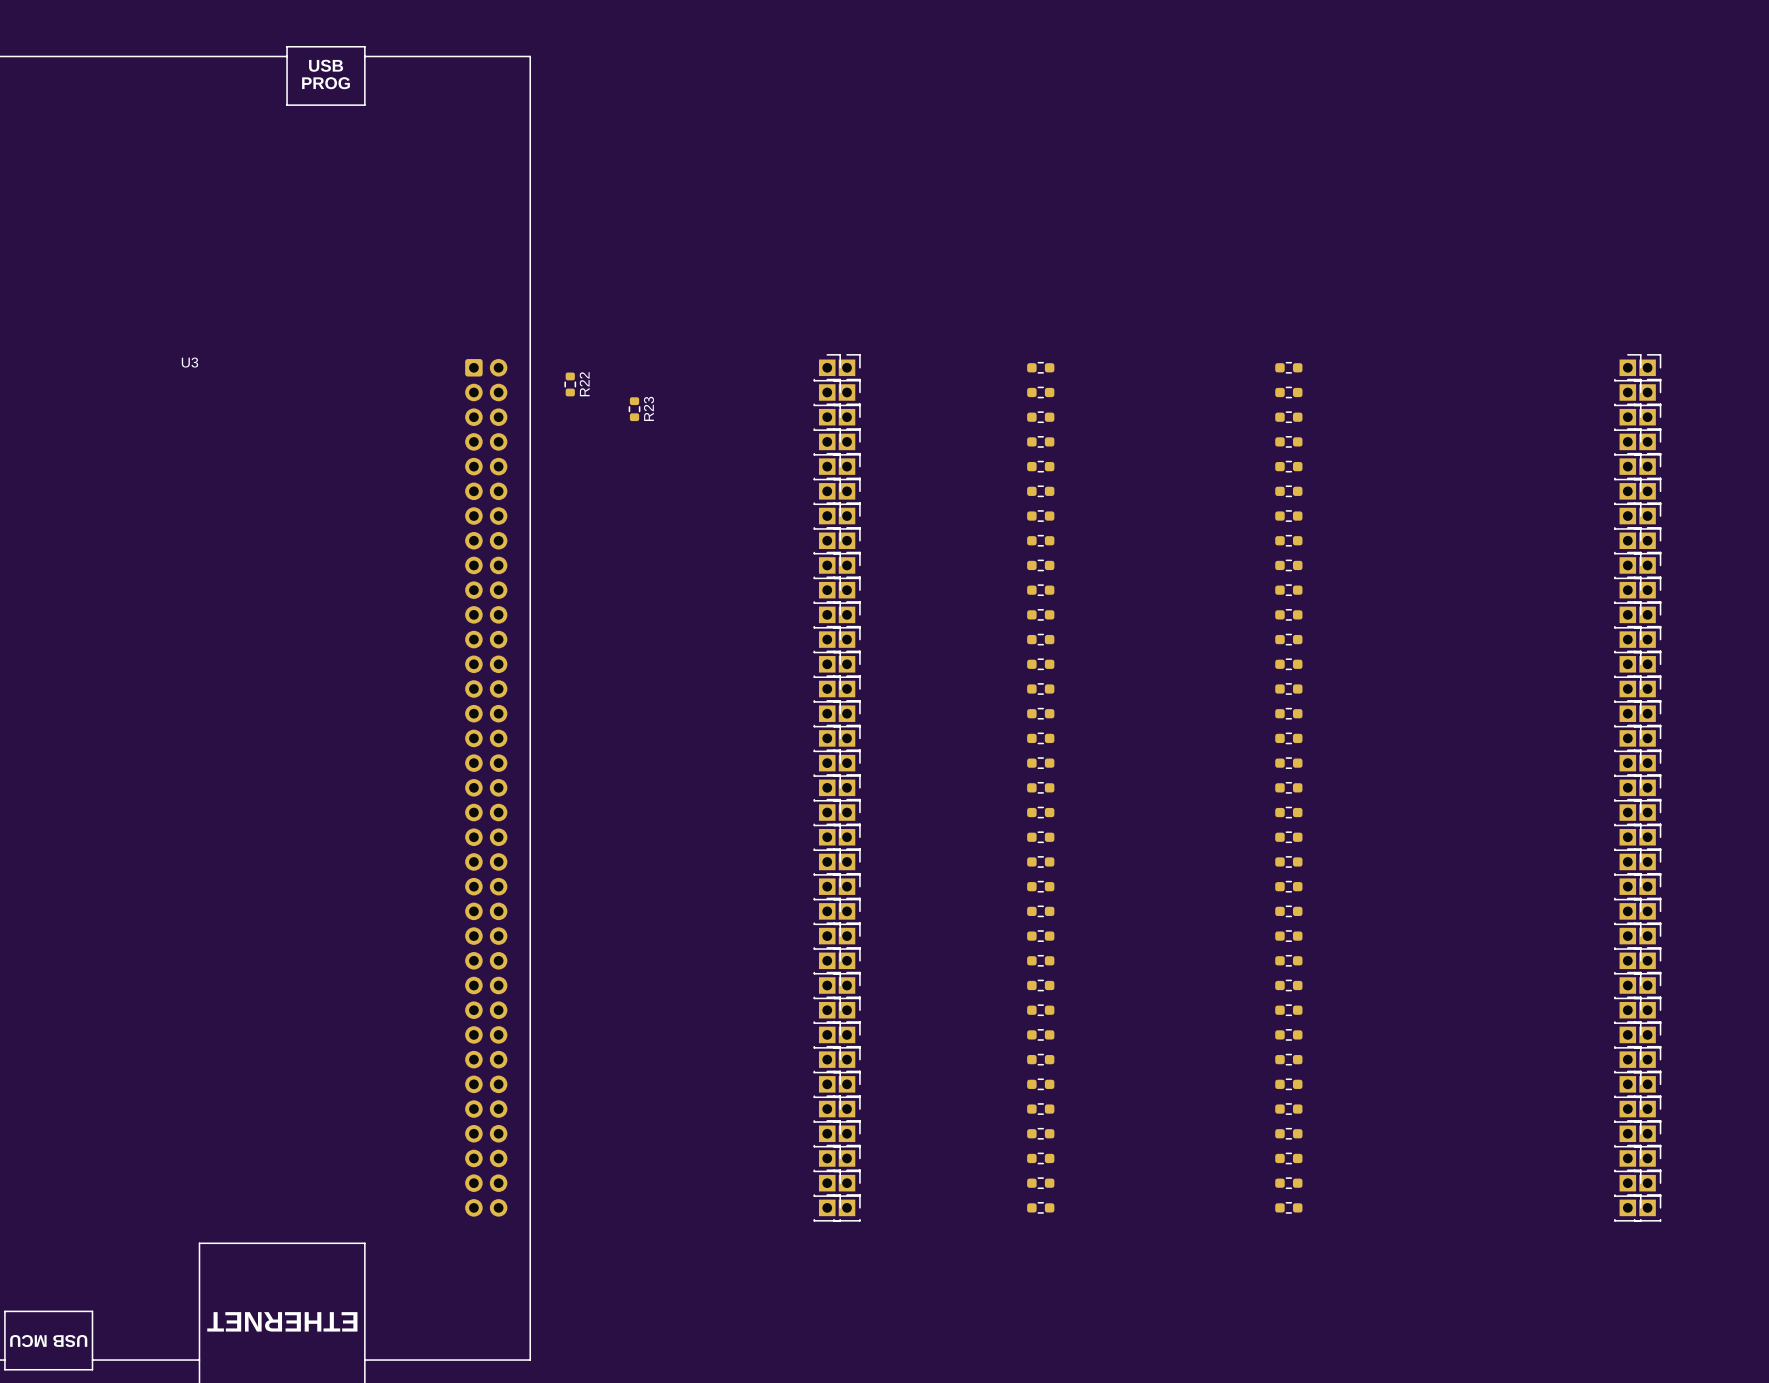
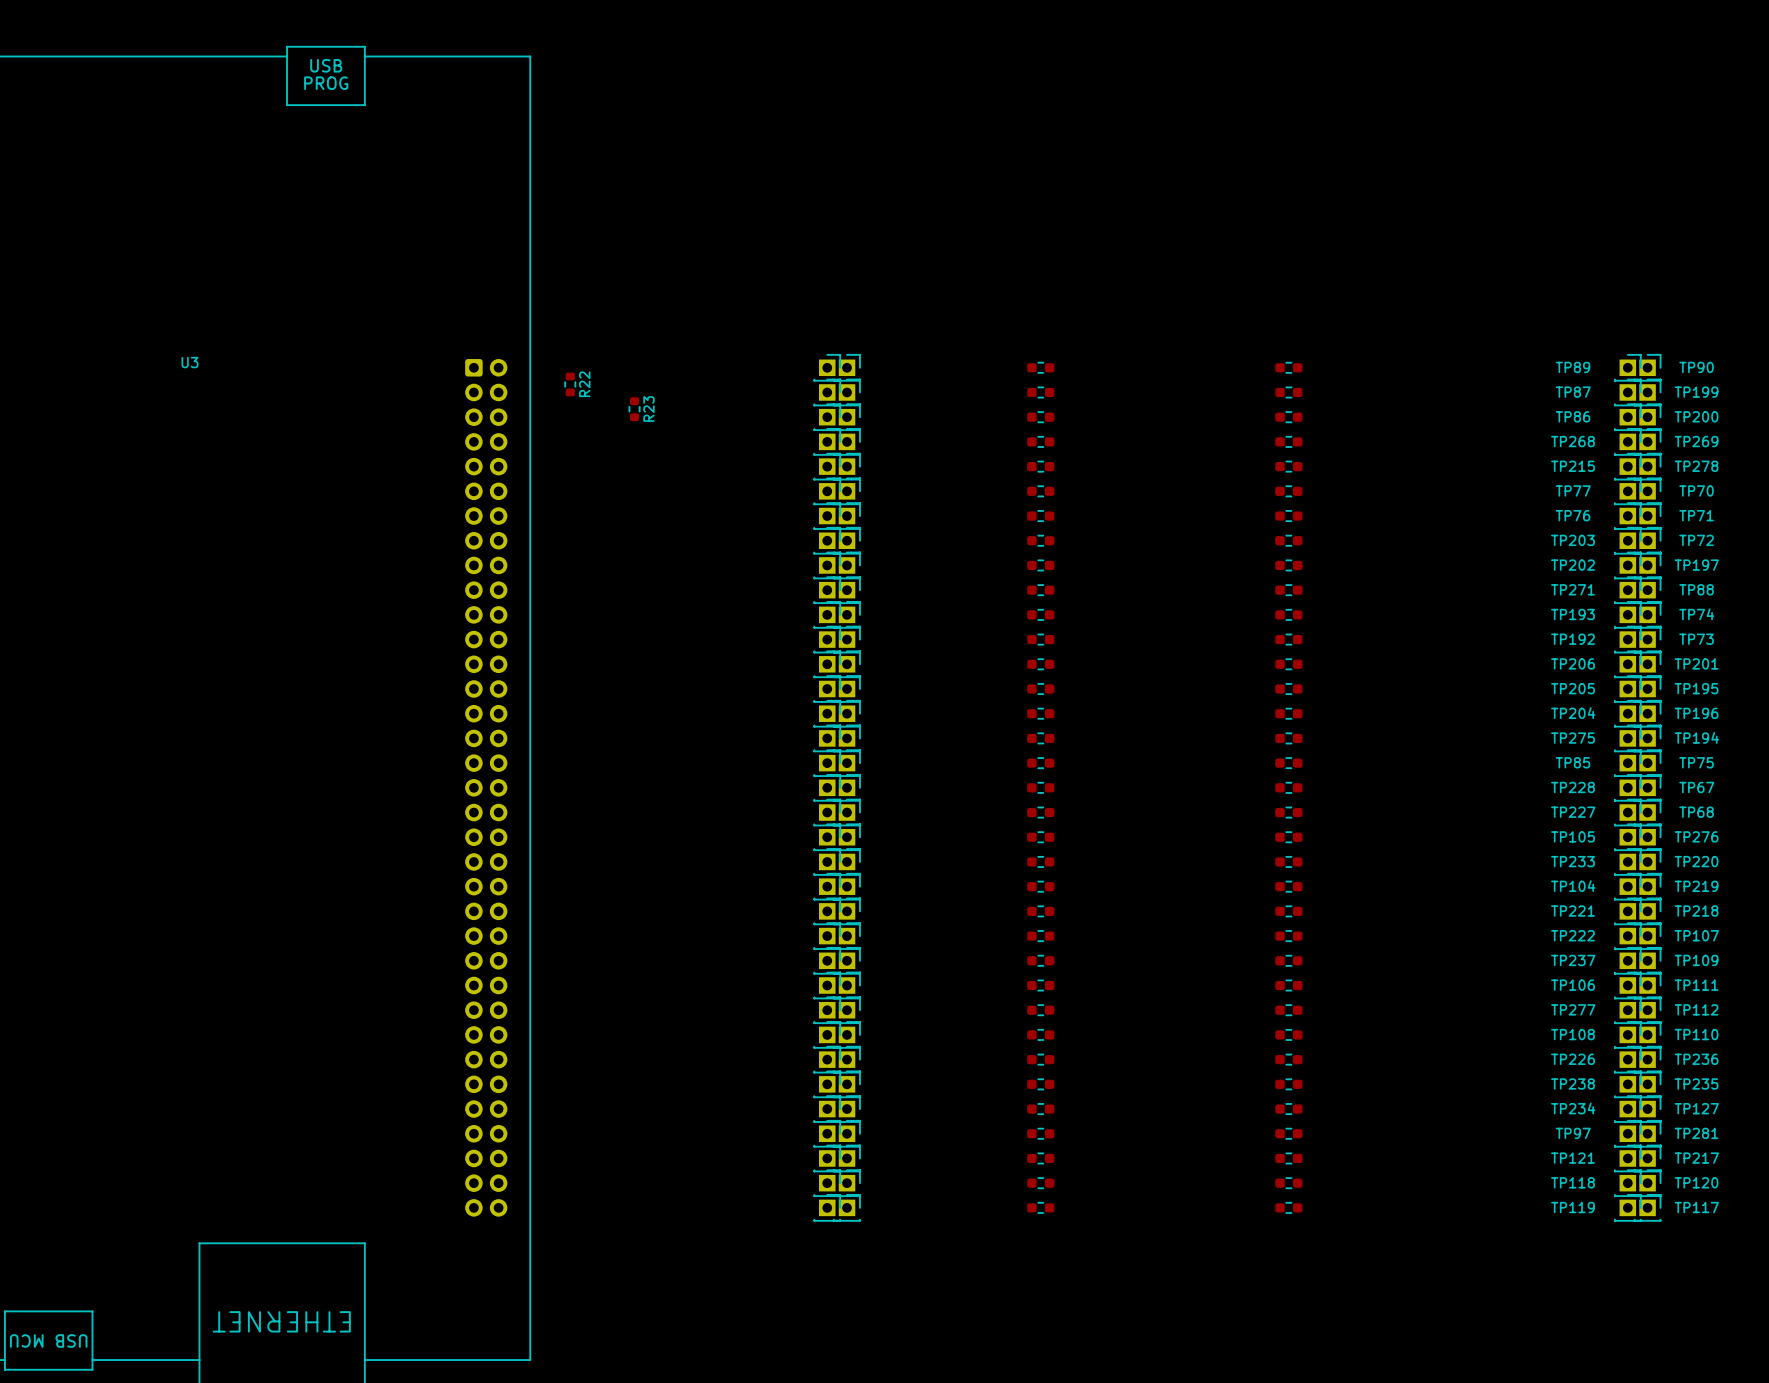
TP89 name: none -> TP89 (1573, 367)
TP90 name: none -> TP90 (1696, 367)
TP87 name: none -> TP87 (1573, 392)
TP199 name: none -> TP199 (1696, 392)
TP86 name: none -> TP86 (1573, 416)
TP200 name: none -> TP200 (1696, 416)
TP268 name: none -> TP268 (1573, 441)
TP269 name: none -> TP269 (1696, 441)
TP215 name: none -> TP215 (1573, 466)
TP278 name: none -> TP278 (1696, 466)
TP77 name: none -> TP77 (1573, 490)
TP70 name: none -> TP70 (1696, 490)
TP76 name: none -> TP76 (1573, 515)
TP71 name: none -> TP71 (1696, 515)
TP203 name: none -> TP203 (1573, 540)
TP72 name: none -> TP72 (1696, 540)
TP202 name: none -> TP202 (1573, 565)
TP197 name: none -> TP197 (1696, 565)
TP271 name: none -> TP271 (1573, 589)
TP88 name: none -> TP88 (1696, 589)
TP193 name: none -> TP193 (1573, 614)
TP74 name: none -> TP74 (1696, 614)
TP192 name: none -> TP192 (1573, 639)
TP73 name: none -> TP73 (1696, 639)
TP206 name: none -> TP206 (1573, 663)
TP201 name: none -> TP201 (1696, 663)
TP205 name: none -> TP205 (1573, 688)
TP195 name: none -> TP195 (1696, 688)
TP204 name: none -> TP204 (1573, 713)
TP196 name: none -> TP196 (1696, 713)
TP275 name: none -> TP275 (1573, 738)
TP194 name: none -> TP194 (1696, 737)
TP85 name: none -> TP85 (1573, 762)
TP75 name: none -> TP75 (1696, 762)
TP228 name: none -> TP228 (1573, 787)
TP67 name: none -> TP67 (1696, 787)
TP227 name: none -> TP227 (1573, 812)
TP68 name: none -> TP68 (1696, 812)
TP105 name: none -> TP105 (1573, 836)
TP276 name: none -> TP276 (1696, 836)
TP233 name: none -> TP233 (1573, 861)
TP220 name: none -> TP220 (1696, 861)
TP104 name: none -> TP104 (1573, 886)
TP219 name: none -> TP219 (1696, 886)
TP221 name: none -> TP221 (1573, 911)
TP218 name: none -> TP218 (1696, 911)
TP222 name: none -> TP222 (1573, 935)
TP107 name: none -> TP107 (1696, 935)
TP237 name: none -> TP237 (1573, 960)
TP109 name: none -> TP109 (1696, 960)
TP106 name: none -> TP106 (1573, 985)
TP111 name: none -> TP111 (1696, 985)
TP277 name: none -> TP277 (1573, 1009)
TP112 name: none -> TP112 (1696, 1009)
TP108 name: none -> TP108 (1573, 1034)
TP110 name: none -> TP110 (1696, 1034)
TP226 name: none -> TP226 (1573, 1059)
TP236 name: none -> TP236 (1696, 1059)
TP238 name: none -> TP238 (1573, 1083)
TP235 name: none -> TP235 (1696, 1083)
TP234 name: none -> TP234 (1573, 1108)
TP127 name: none -> TP127 (1696, 1108)
TP97 name: none -> TP97 (1573, 1133)
TP281 name: none -> TP281 (1696, 1133)
TP121 name: none -> TP121 (1573, 1158)
TP217 name: none -> TP217 (1696, 1158)
TP118 name: none -> TP118 (1573, 1182)
TP120 name: none -> TP120 (1696, 1182)
TP119 name: none -> TP119 (1573, 1207)
TP117 name: none -> TP117 (1696, 1207)

